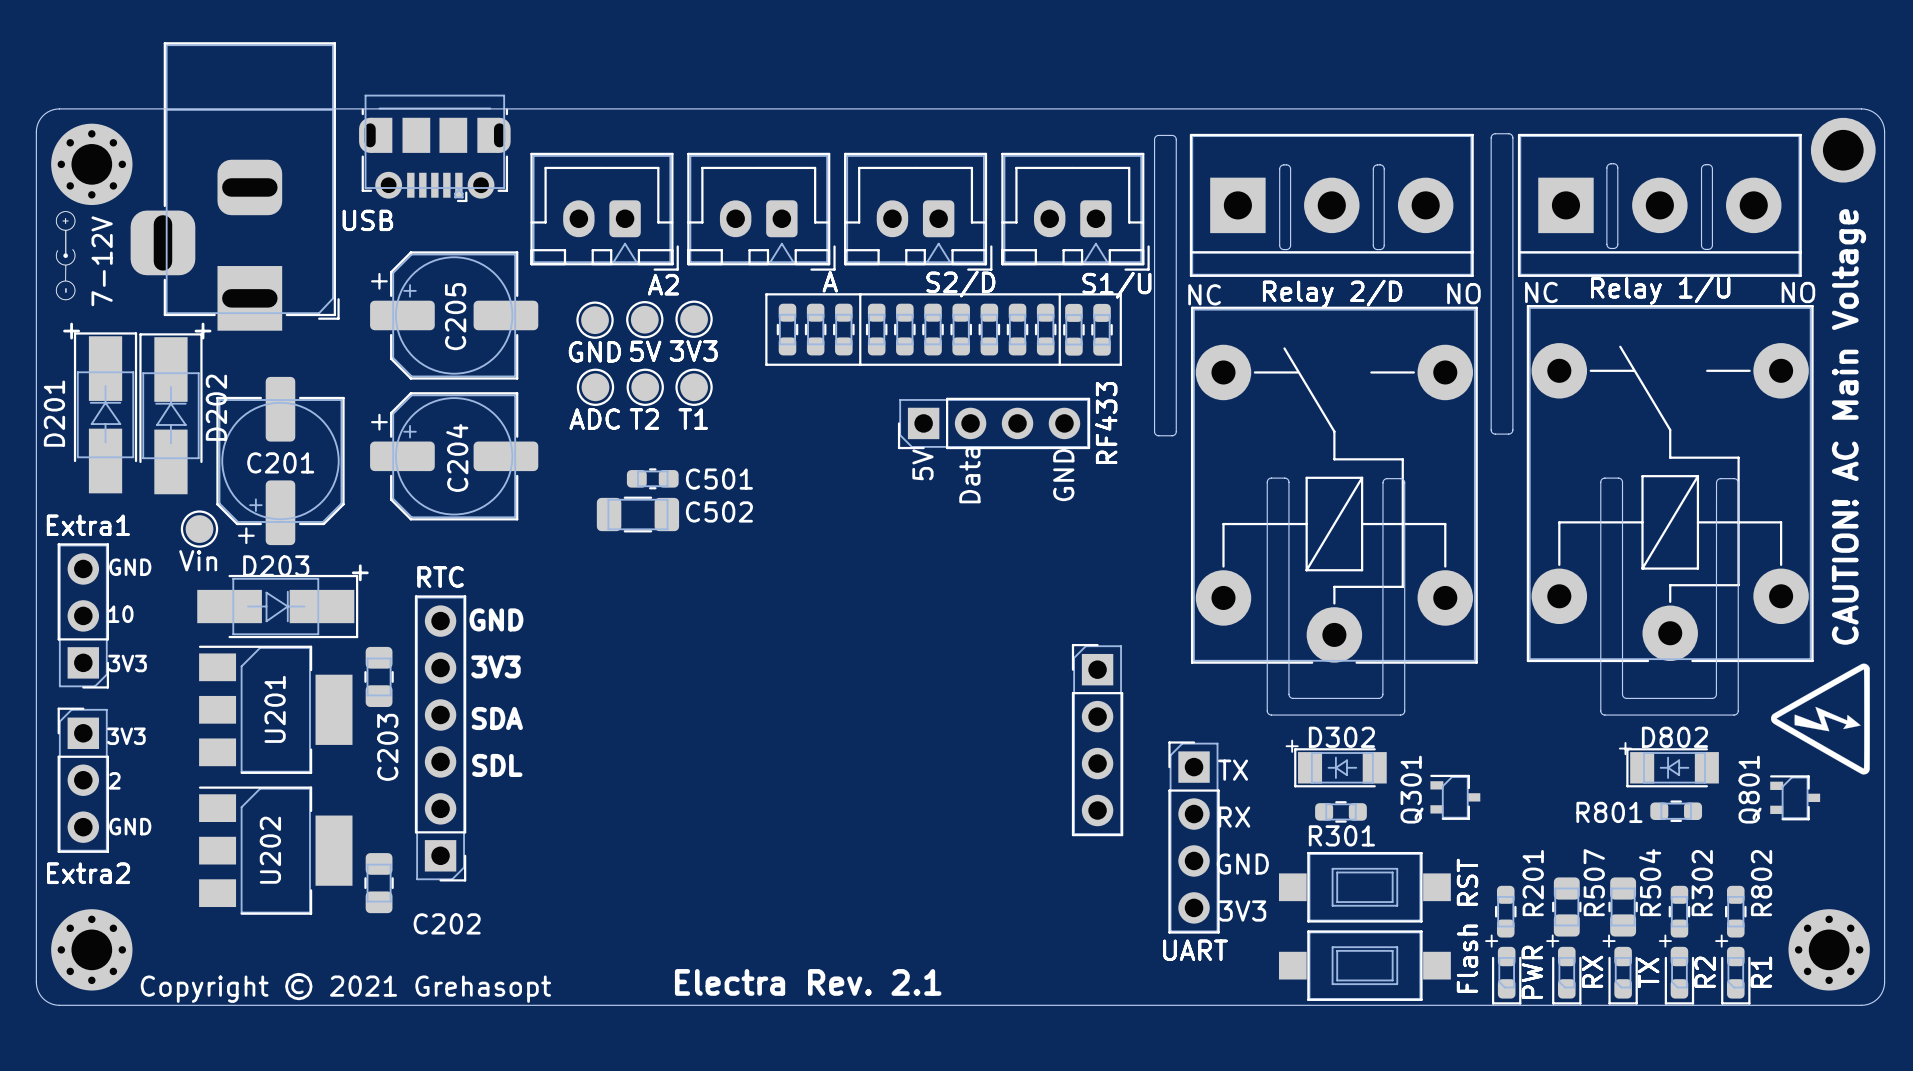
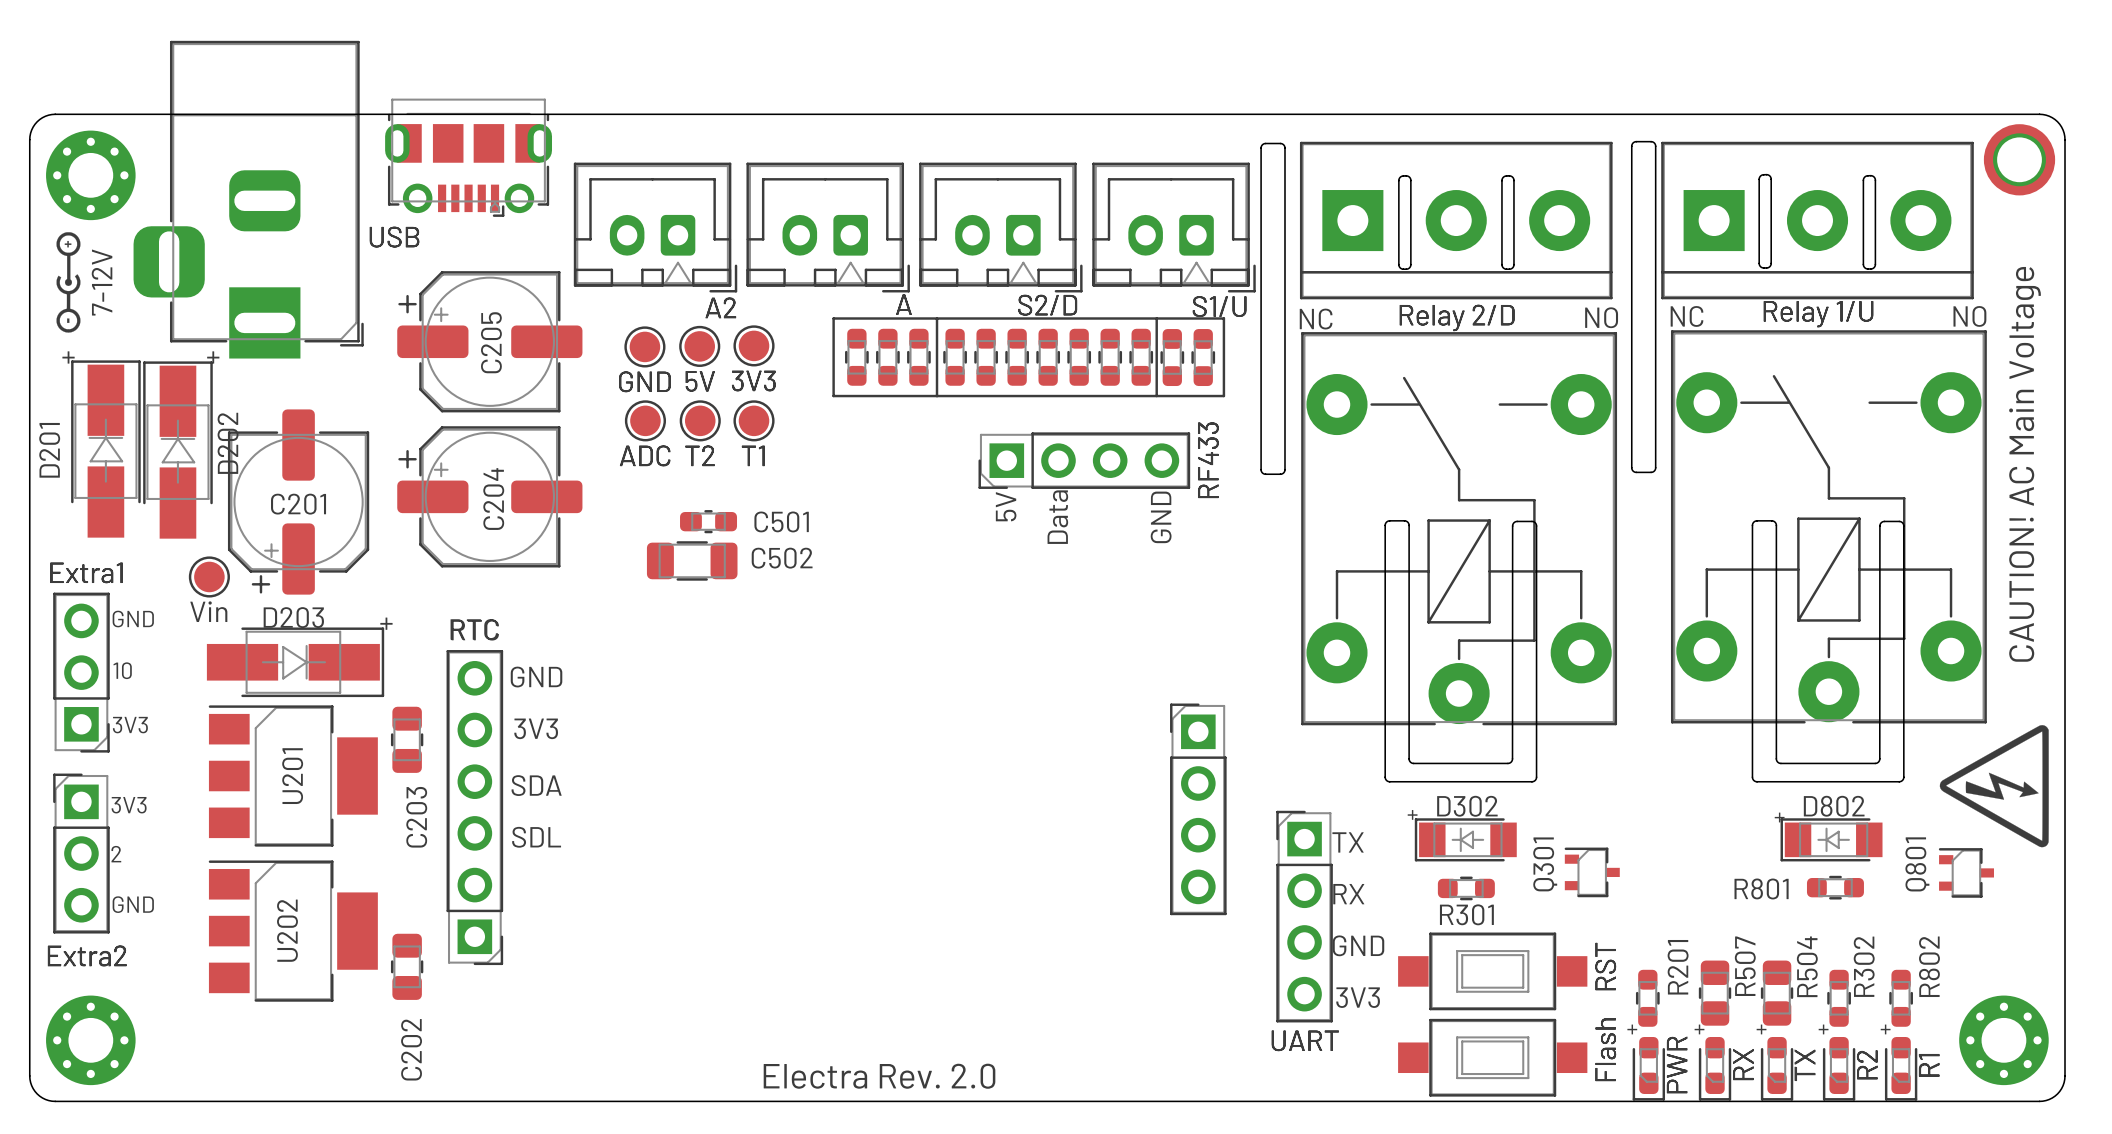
drawing shape: [55, 211, 76, 301] -> [56, 232, 81, 333]
C202 name rotation: 0° (447, 923) -> 90° counterclockwise (411, 1049)
text: Electra Rev. 2.1 (808, 982) -> Electra Rev. 2.0 (879, 1076)
text: Copyright © 2021 Grehasopt (345, 987) -> none

